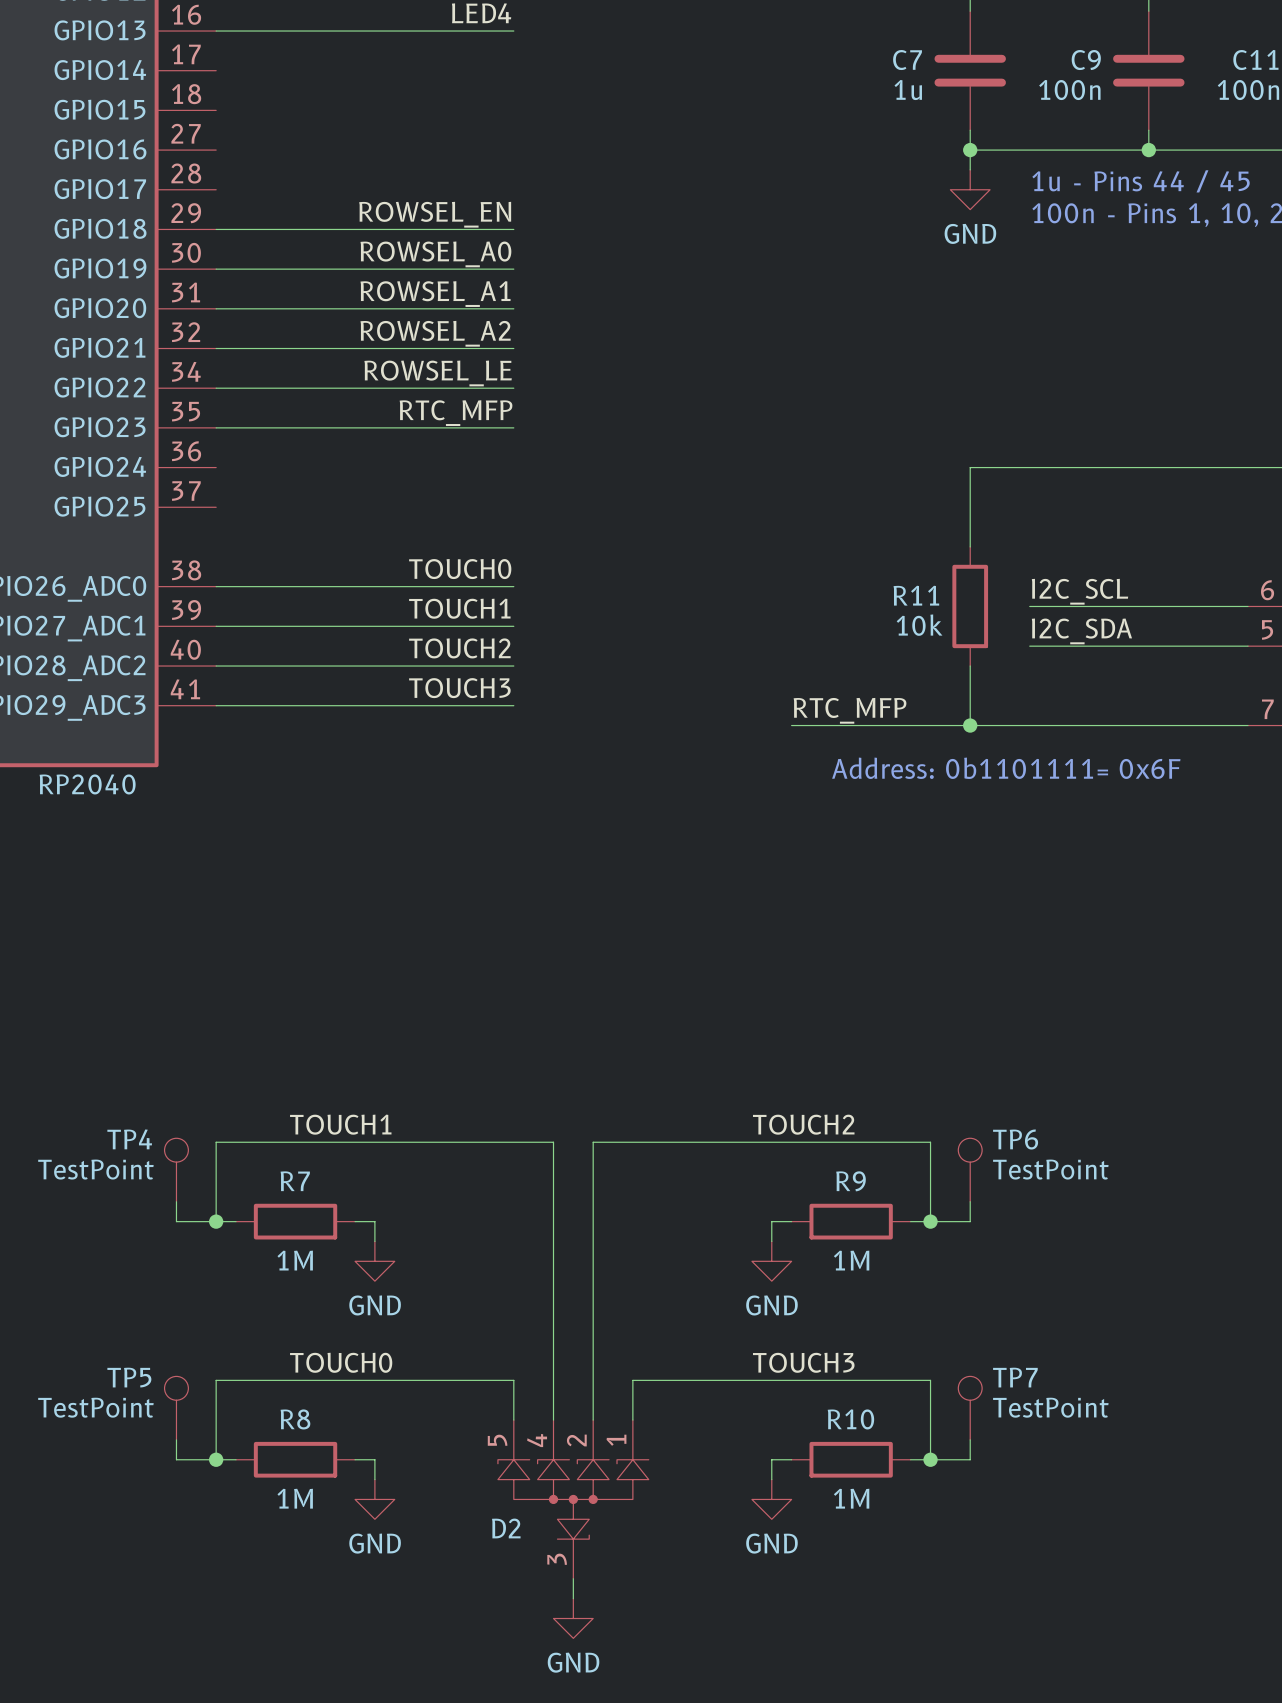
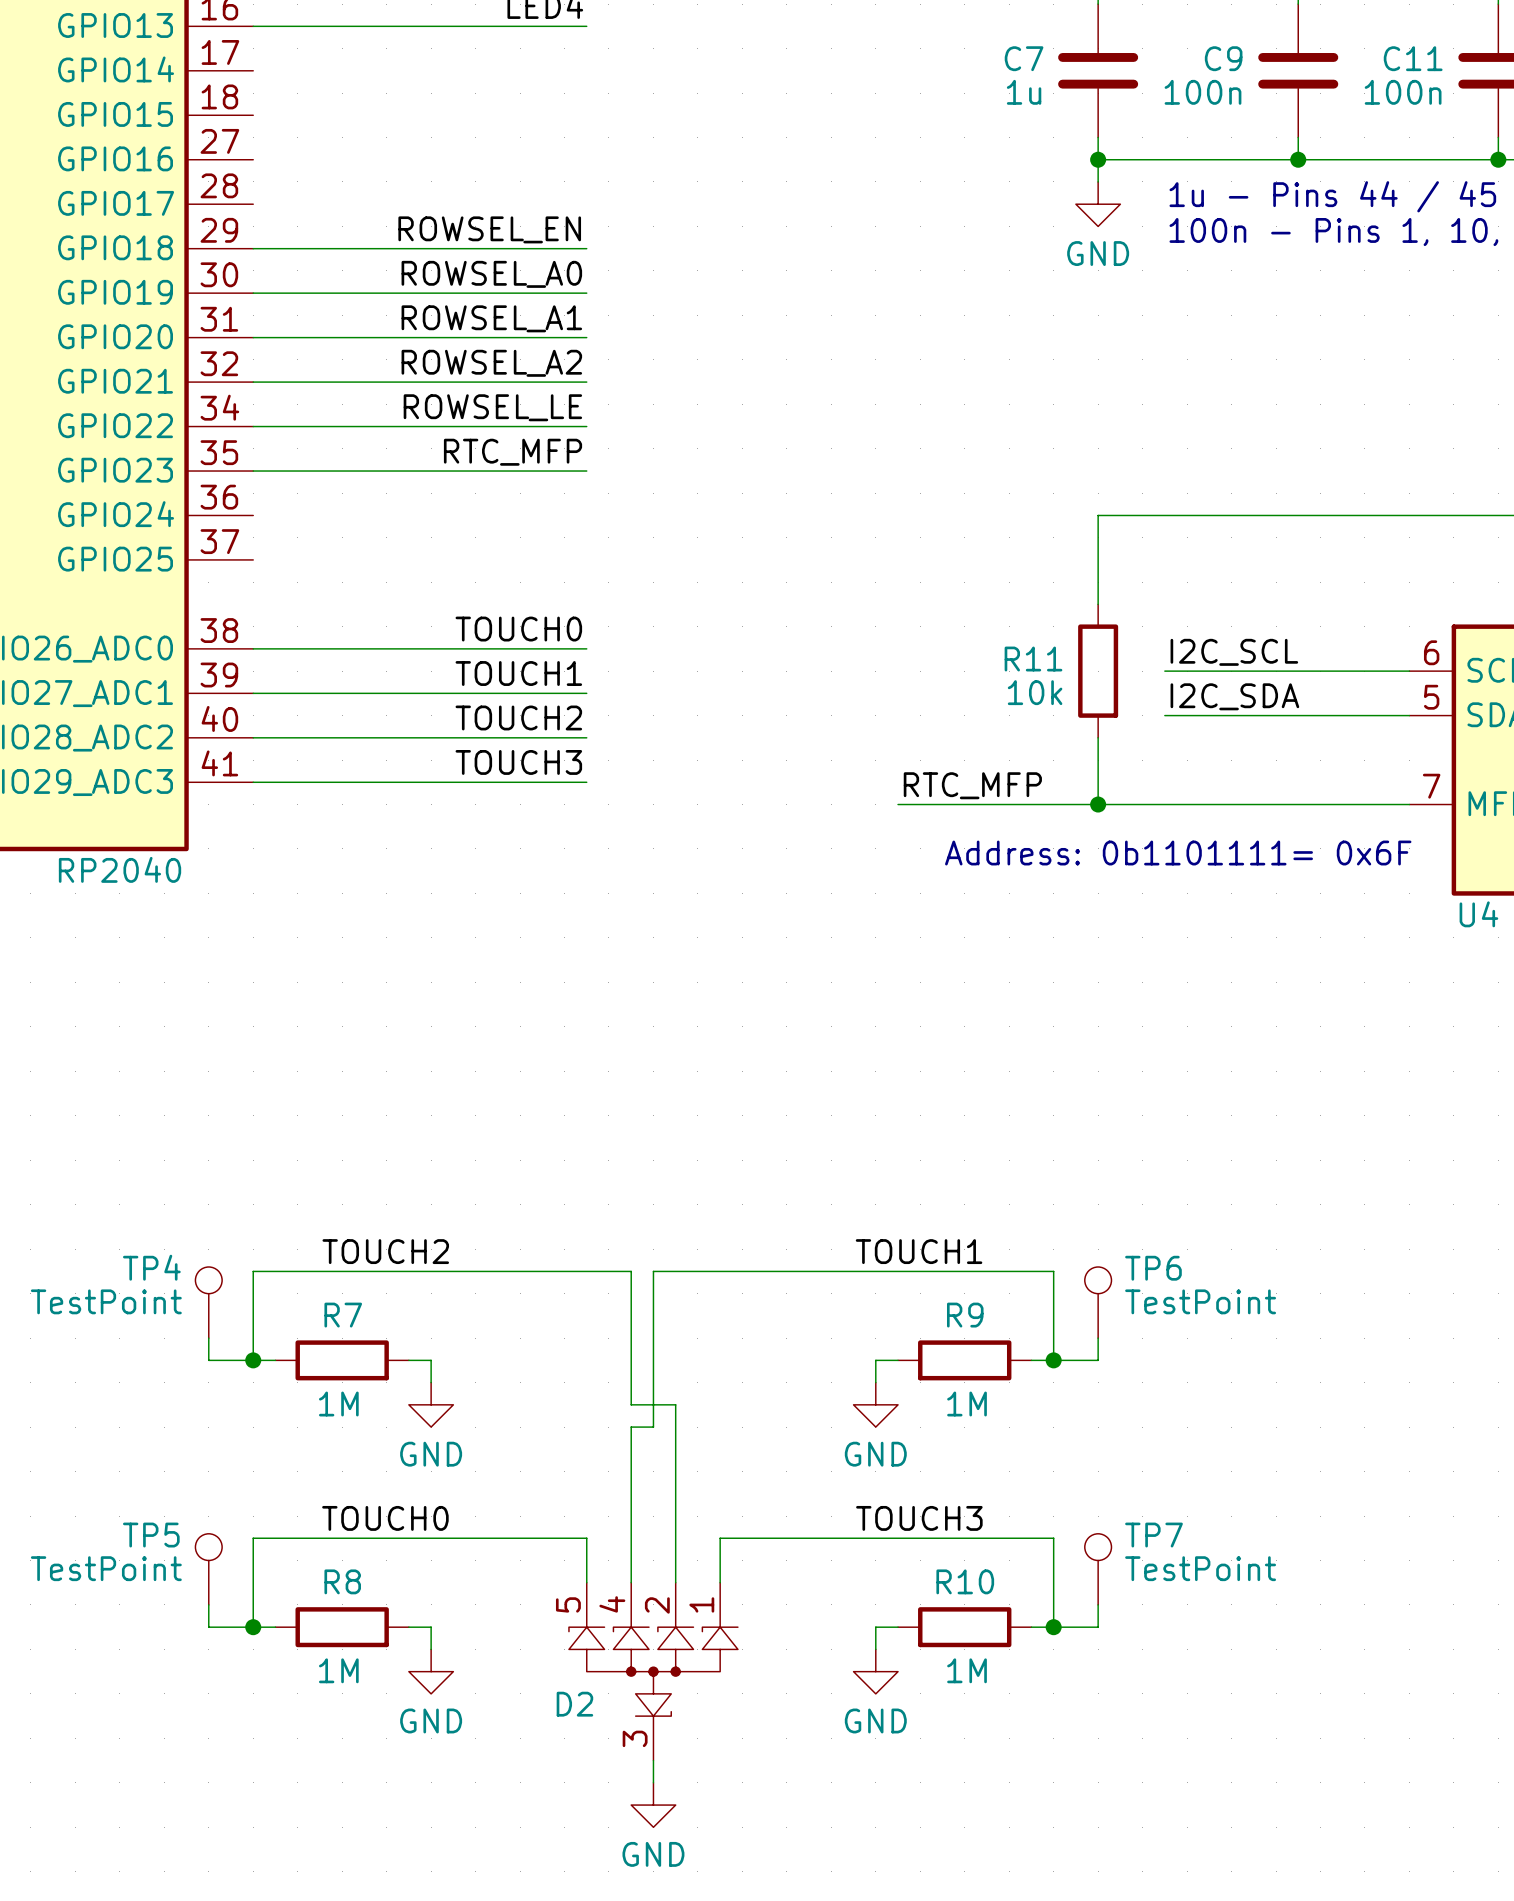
label: TOUCH1 (340, 1124) -> TOUCH2 (385, 1251)
label: TOUCH2 (803, 1124) -> TOUCH1 (919, 1251)
wire: (593, 1142) (593, 1261) -> (675, 1271) (653, 1271) (653, 1427) (631, 1427)
wire: (553, 1261) (553, 1281) -> (631, 1404) (675, 1404)

